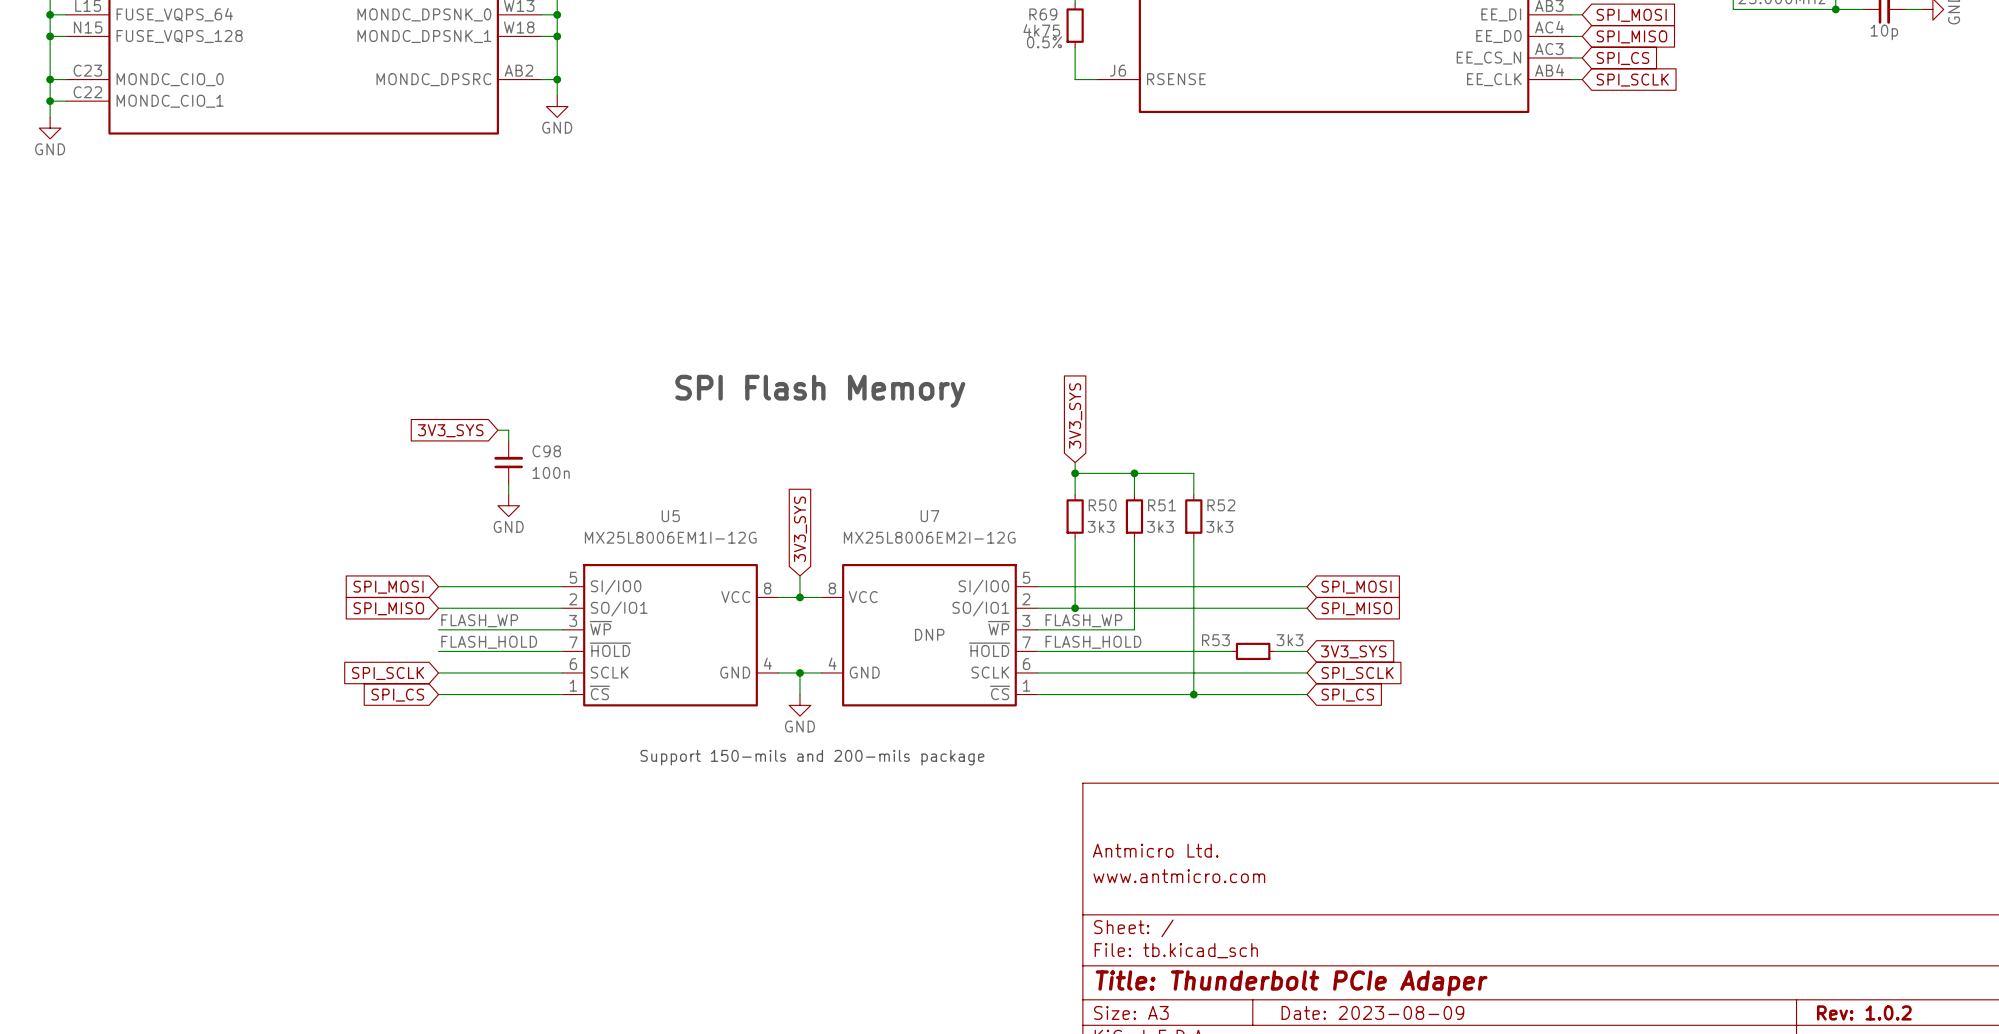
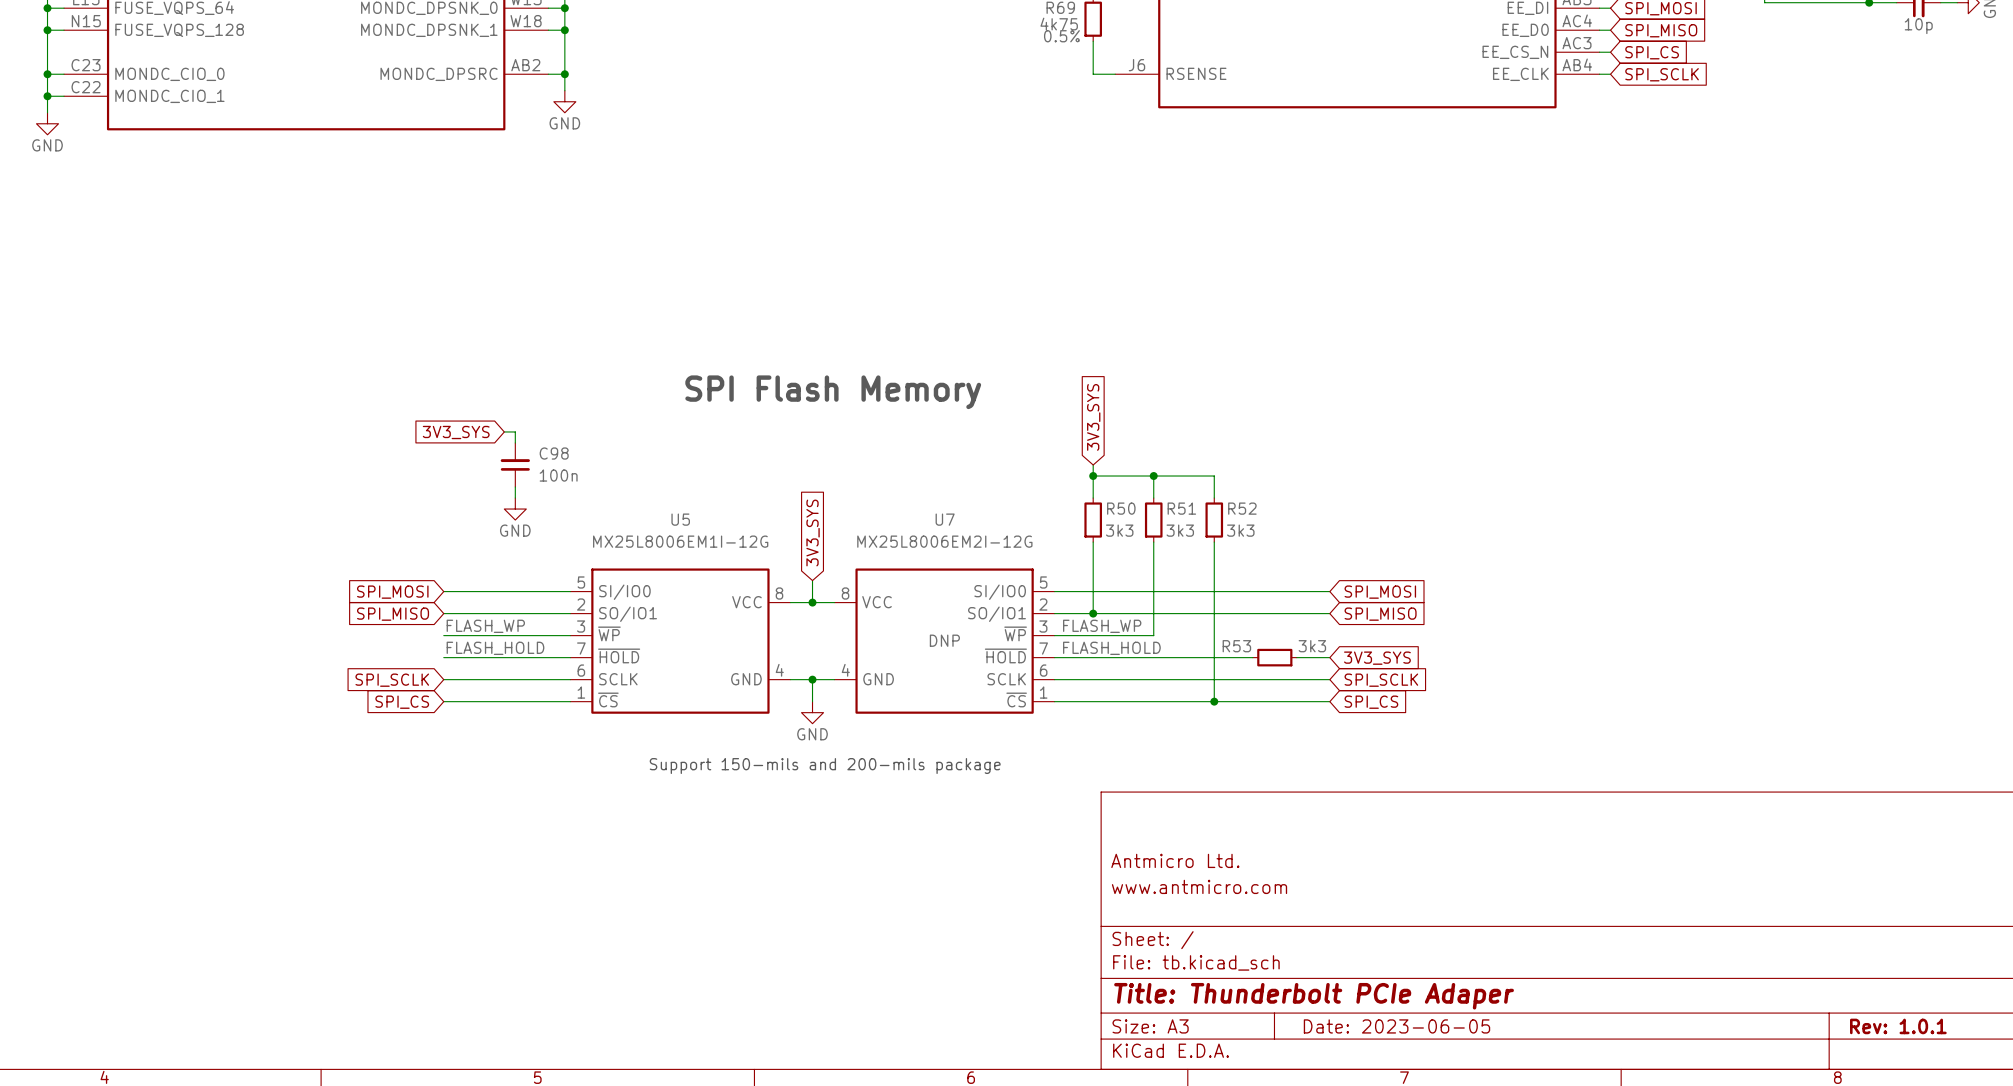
title block: Date: 2023-08-09 (1372, 1012) -> Date: 2023-06-05 (1396, 1026)
title block: Rev: 1.0.2 (1864, 1012) -> Rev: 1.0.1 (1898, 1026)

